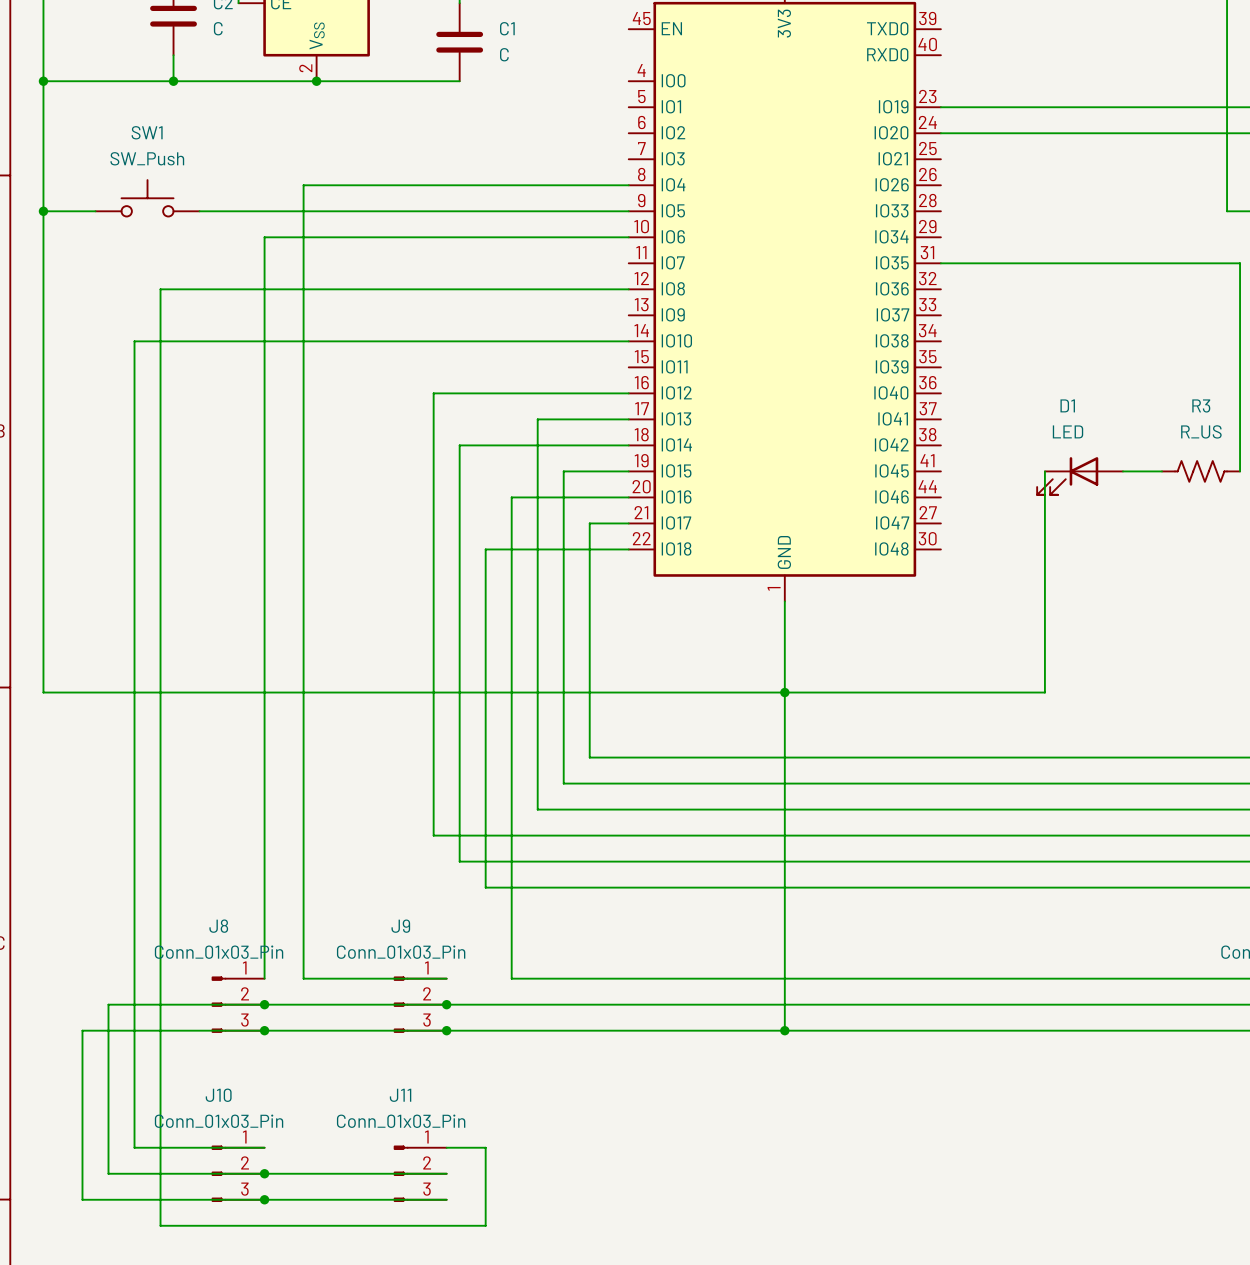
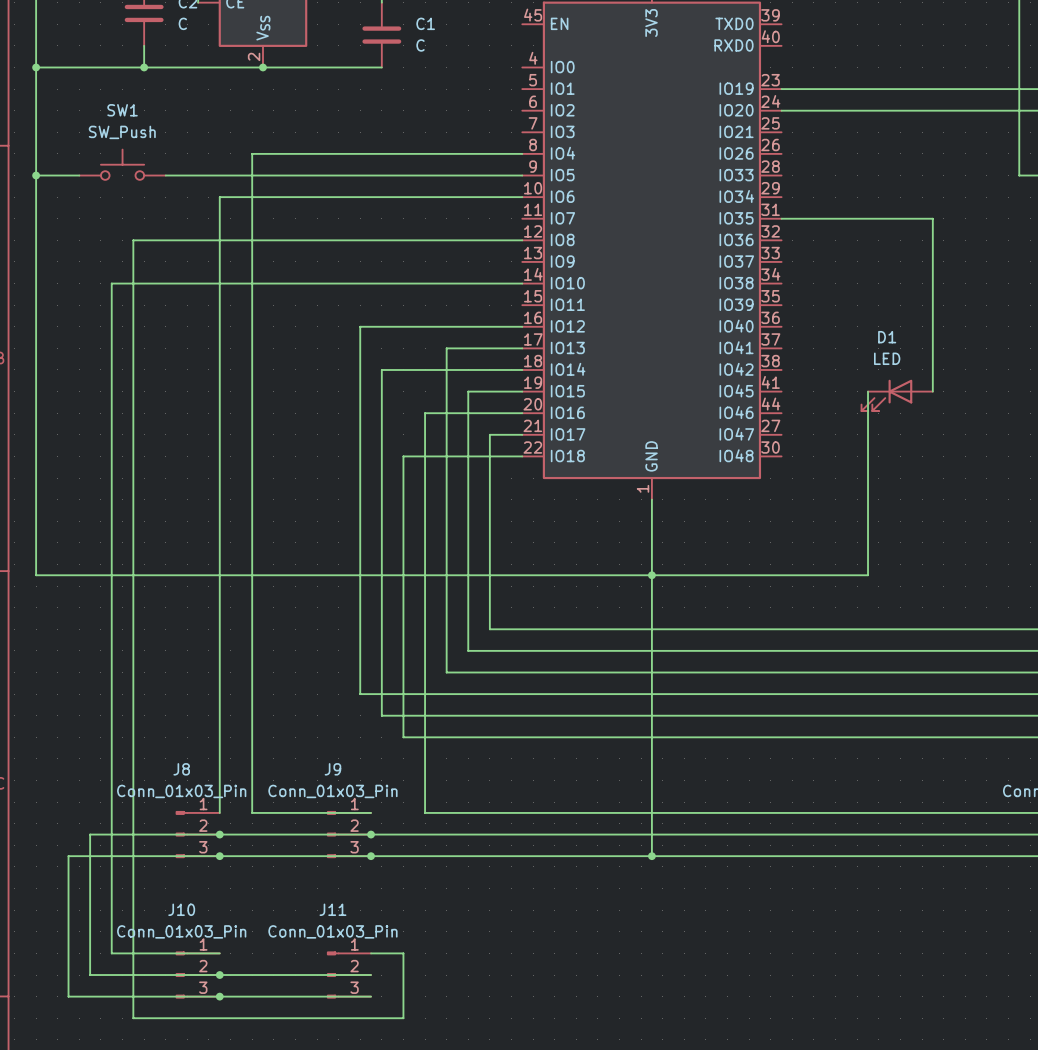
wire: (1122, 263) (1240, 263) (1240, 471) -> (932, 218) (932, 391)
wire: (1122, 471) (1162, 471) -> none
R3: R_US (1201, 471) -> none

